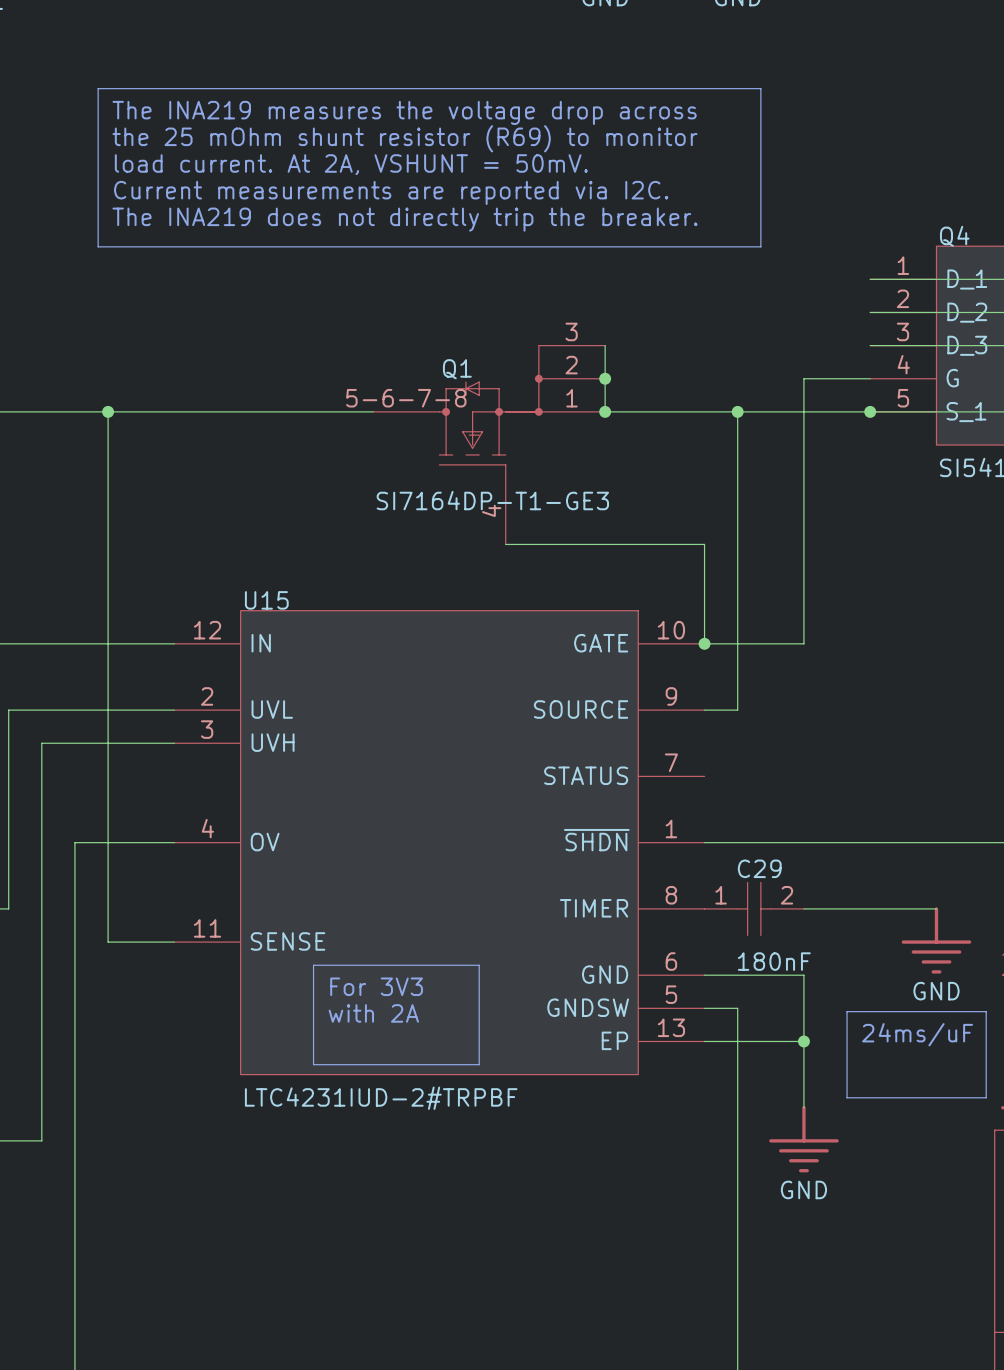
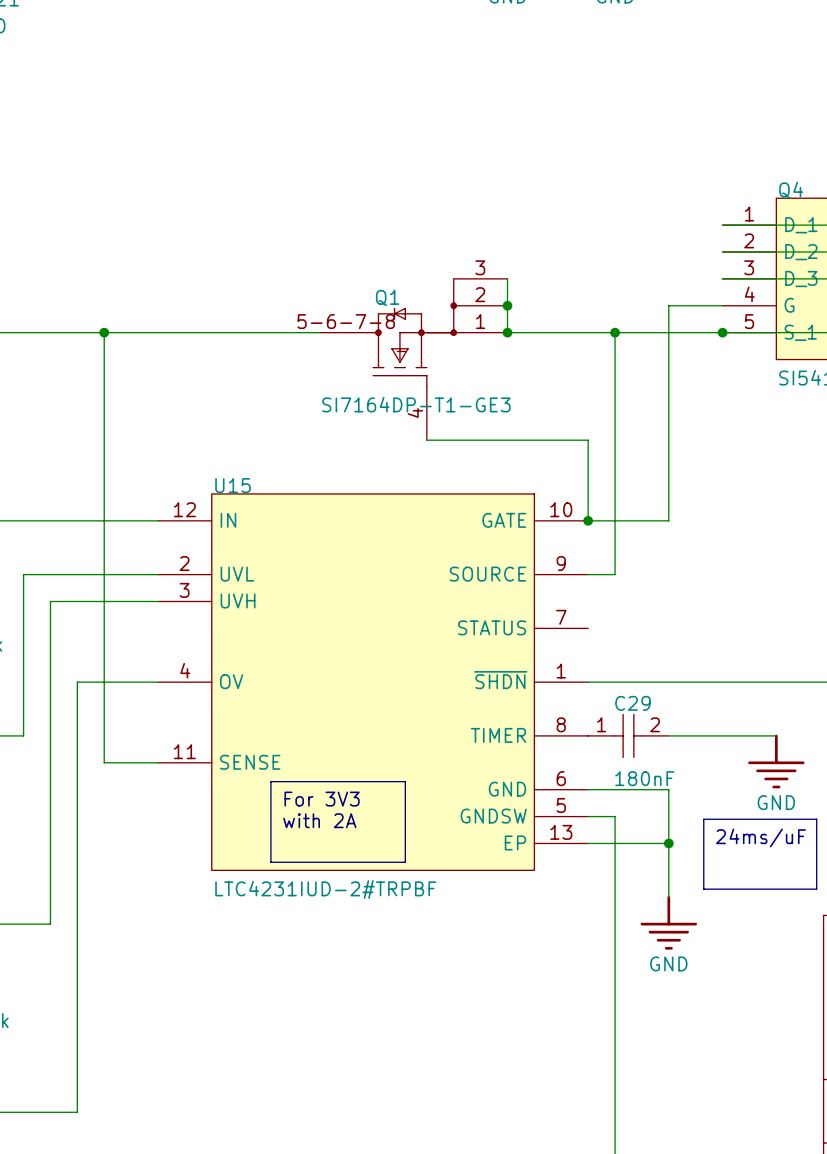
line: (98, 88) (760, 88) (760, 246) (98, 246) (98, 88) -> none
text: The INA219 measures the voltage drop across (404, 112) -> none
text: the 25 mOhm shunt resistor (R69) to monitor (404, 138) -> none
text: load current. At 2A, VSHUNT = 50mV. (351, 164) -> none
text: Current measurements are reported via I2C. (391, 192) -> none
text: The INA219 does not directly trip the breaker. (404, 219) -> none

